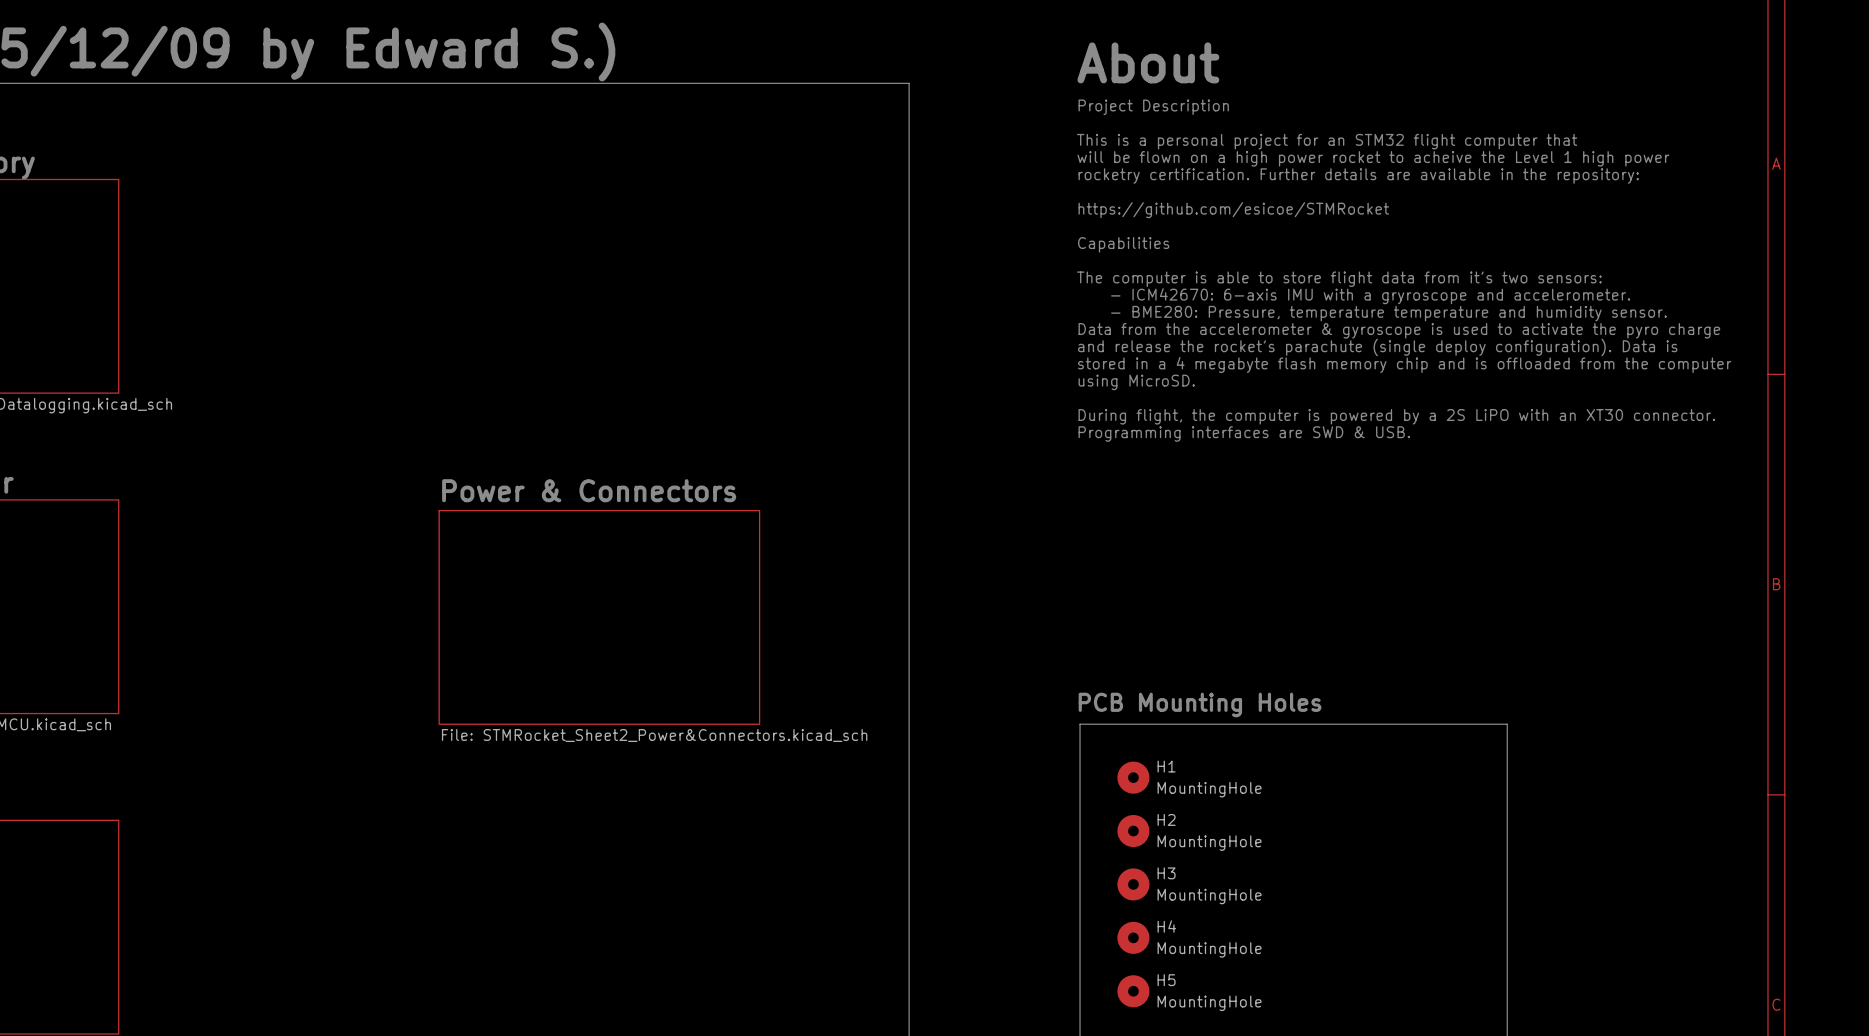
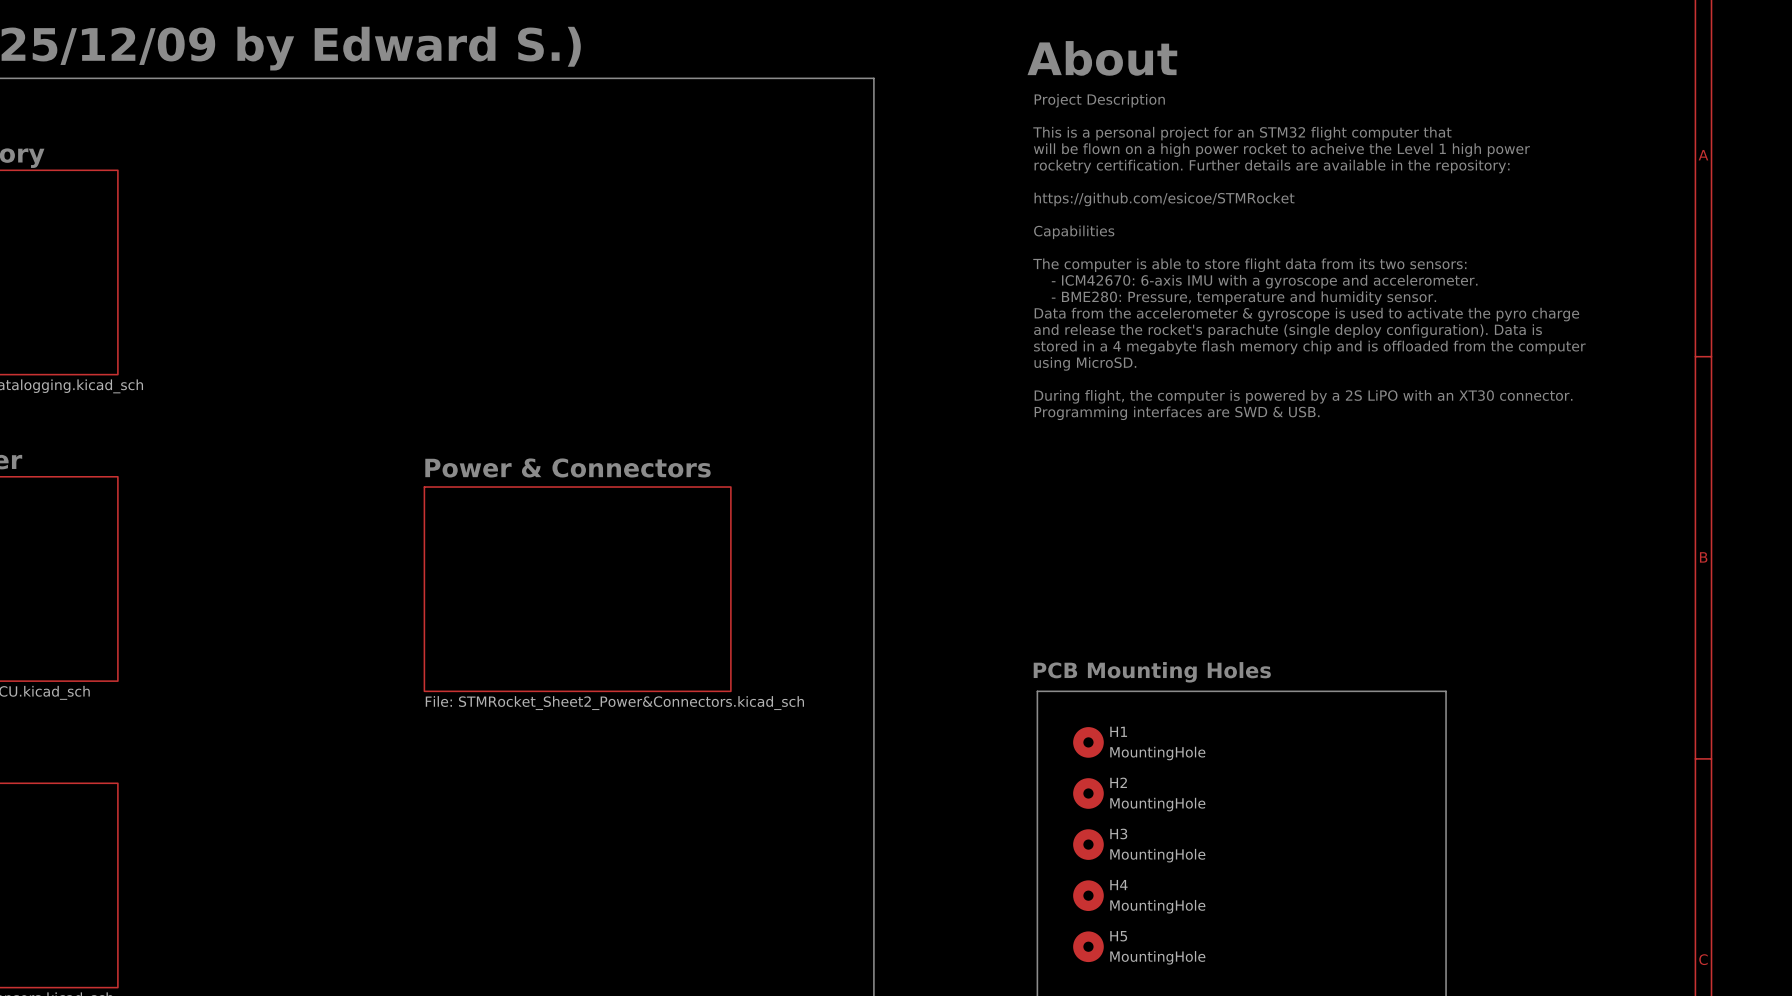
text: The computer is able to store flight data from it's two sensors: (1339, 279) -> The computer is able to store flight data from its two sensors: (1249, 265)
text: - ICM42670: 6-axis IMU with a gryroscope and accelerometer. (1370, 296) -> - ICM42670: 6-axis IMU with a gyroscope and accelerometer. (1264, 281)
text: - BME280: Pressure, temperature temperature and humidity sensor. (1388, 313) -> - BME280: Pressure, temperature and humidity sensor. (1243, 298)

